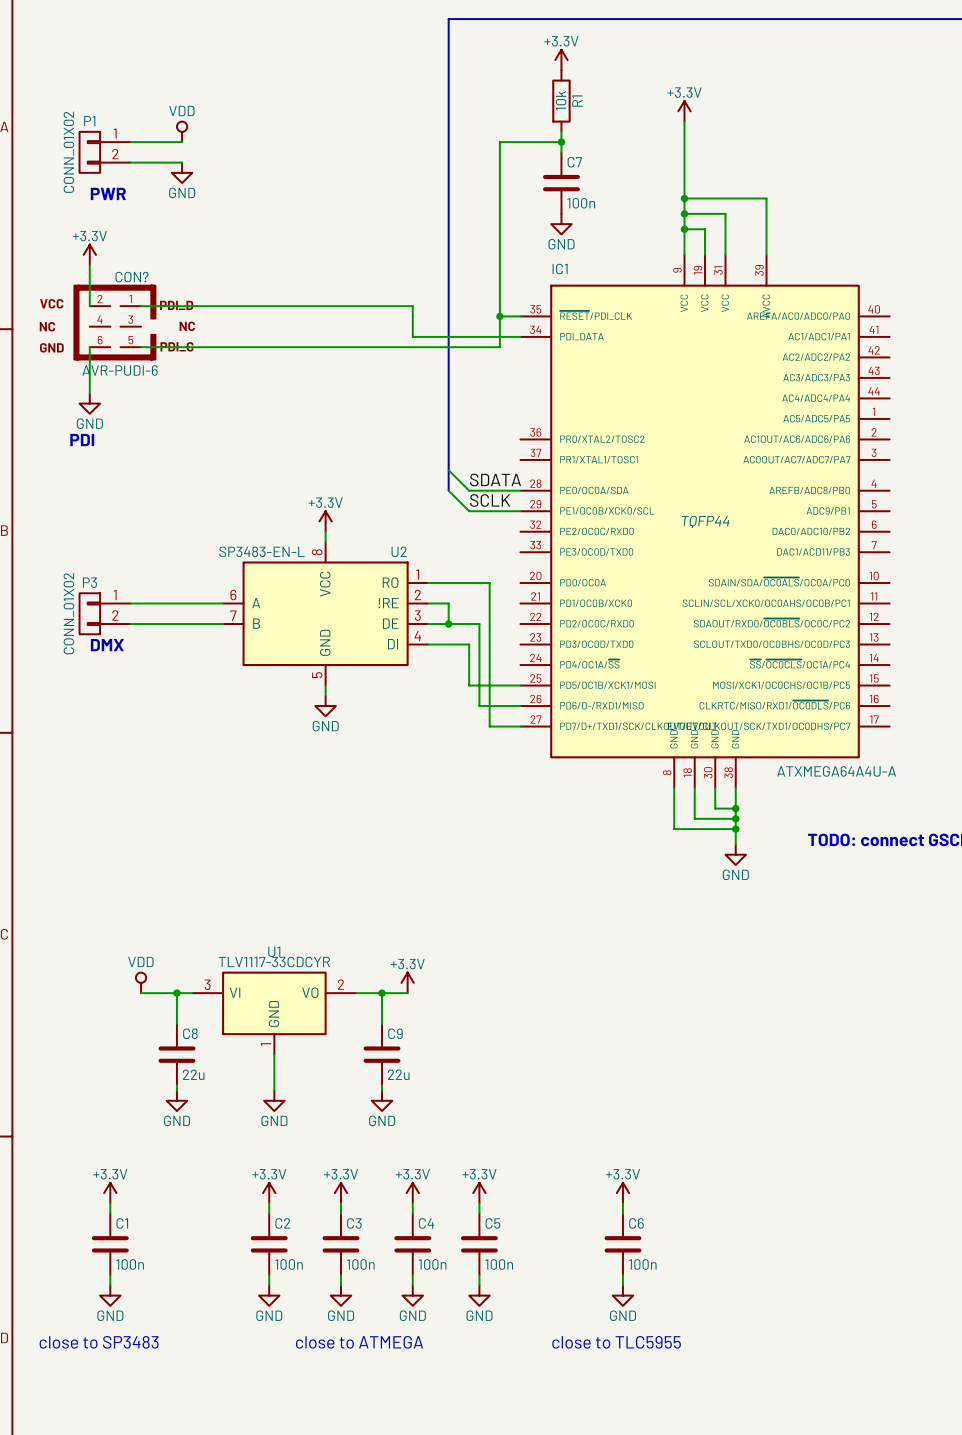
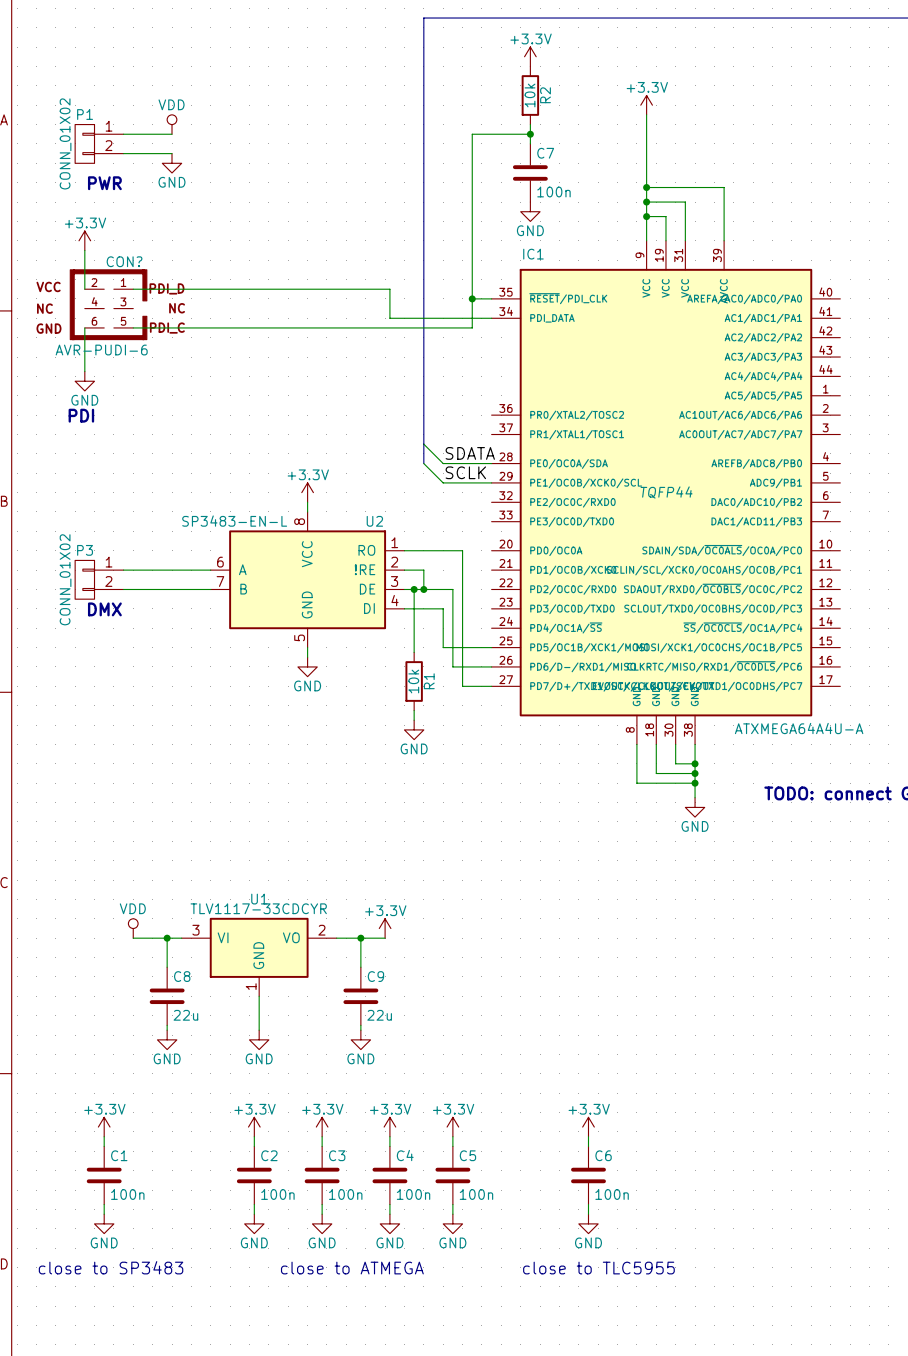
R1 name: R1 (577, 101) -> R2 (545, 95)
wire: none -> (414, 589) (414, 652)
junction: none -> (414, 589)
R1: none -> 10k (414, 681)
wire: none -> (414, 710) (414, 720)
power symbol: none -> GND (414, 729)

